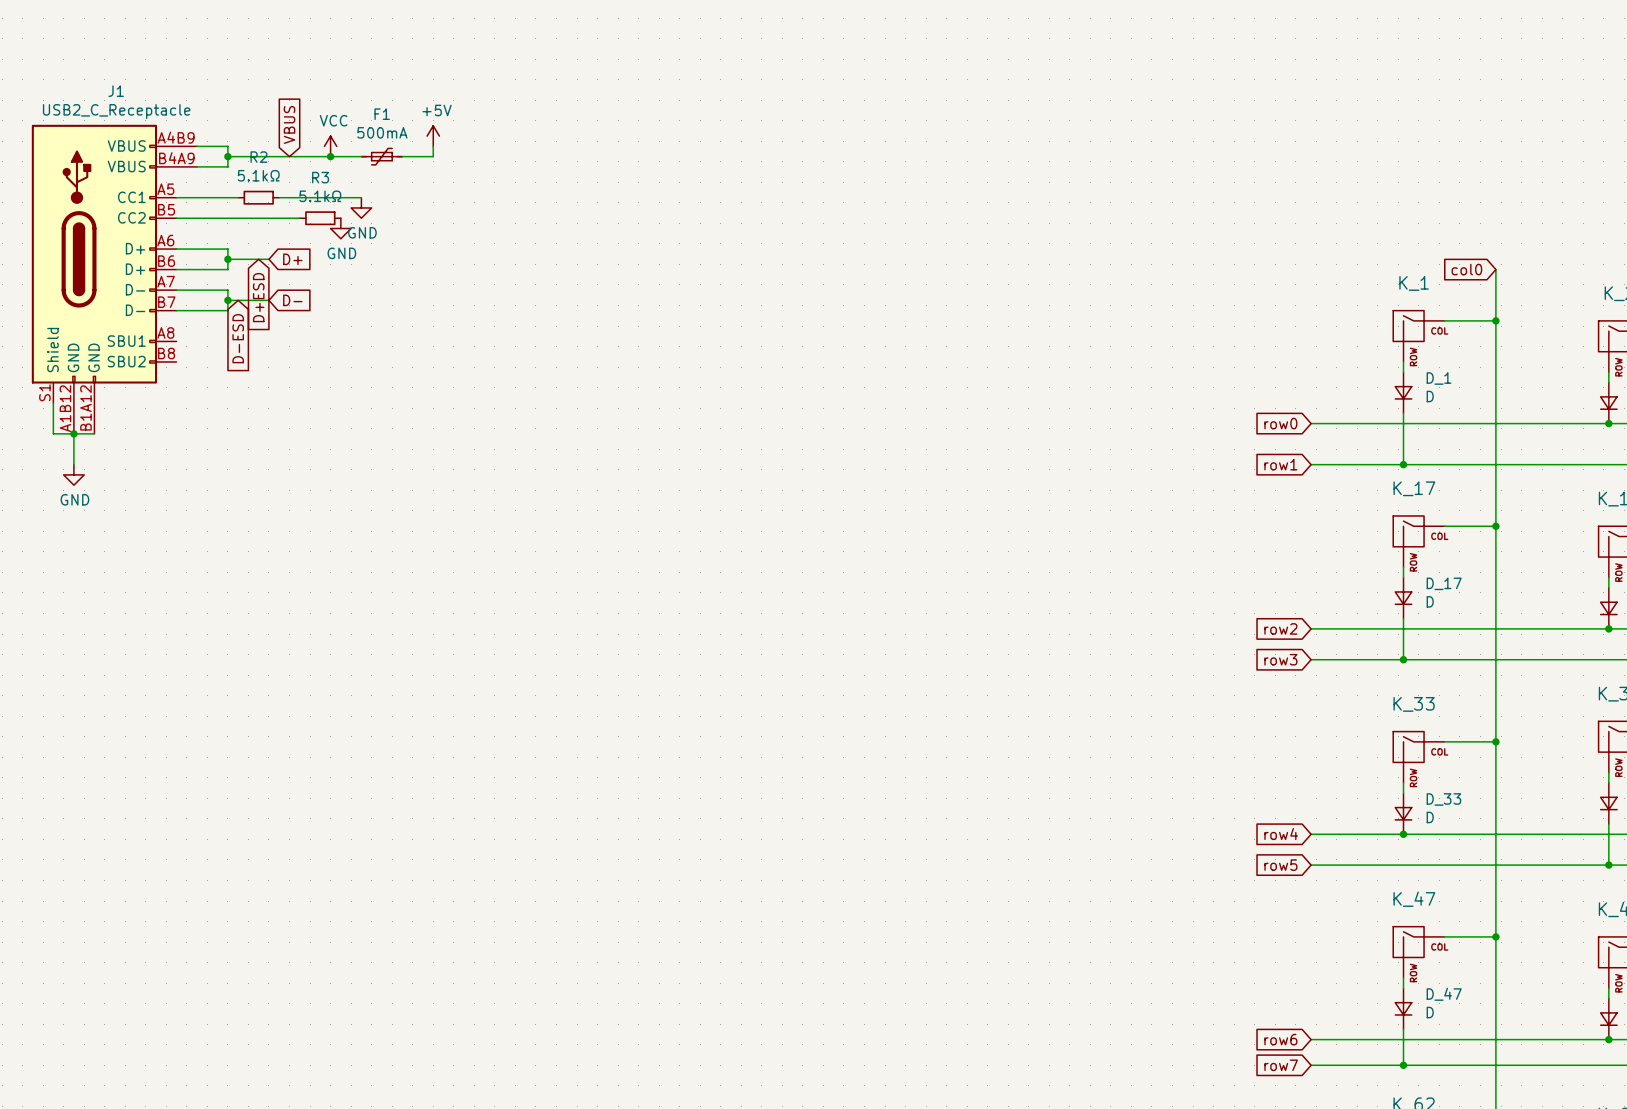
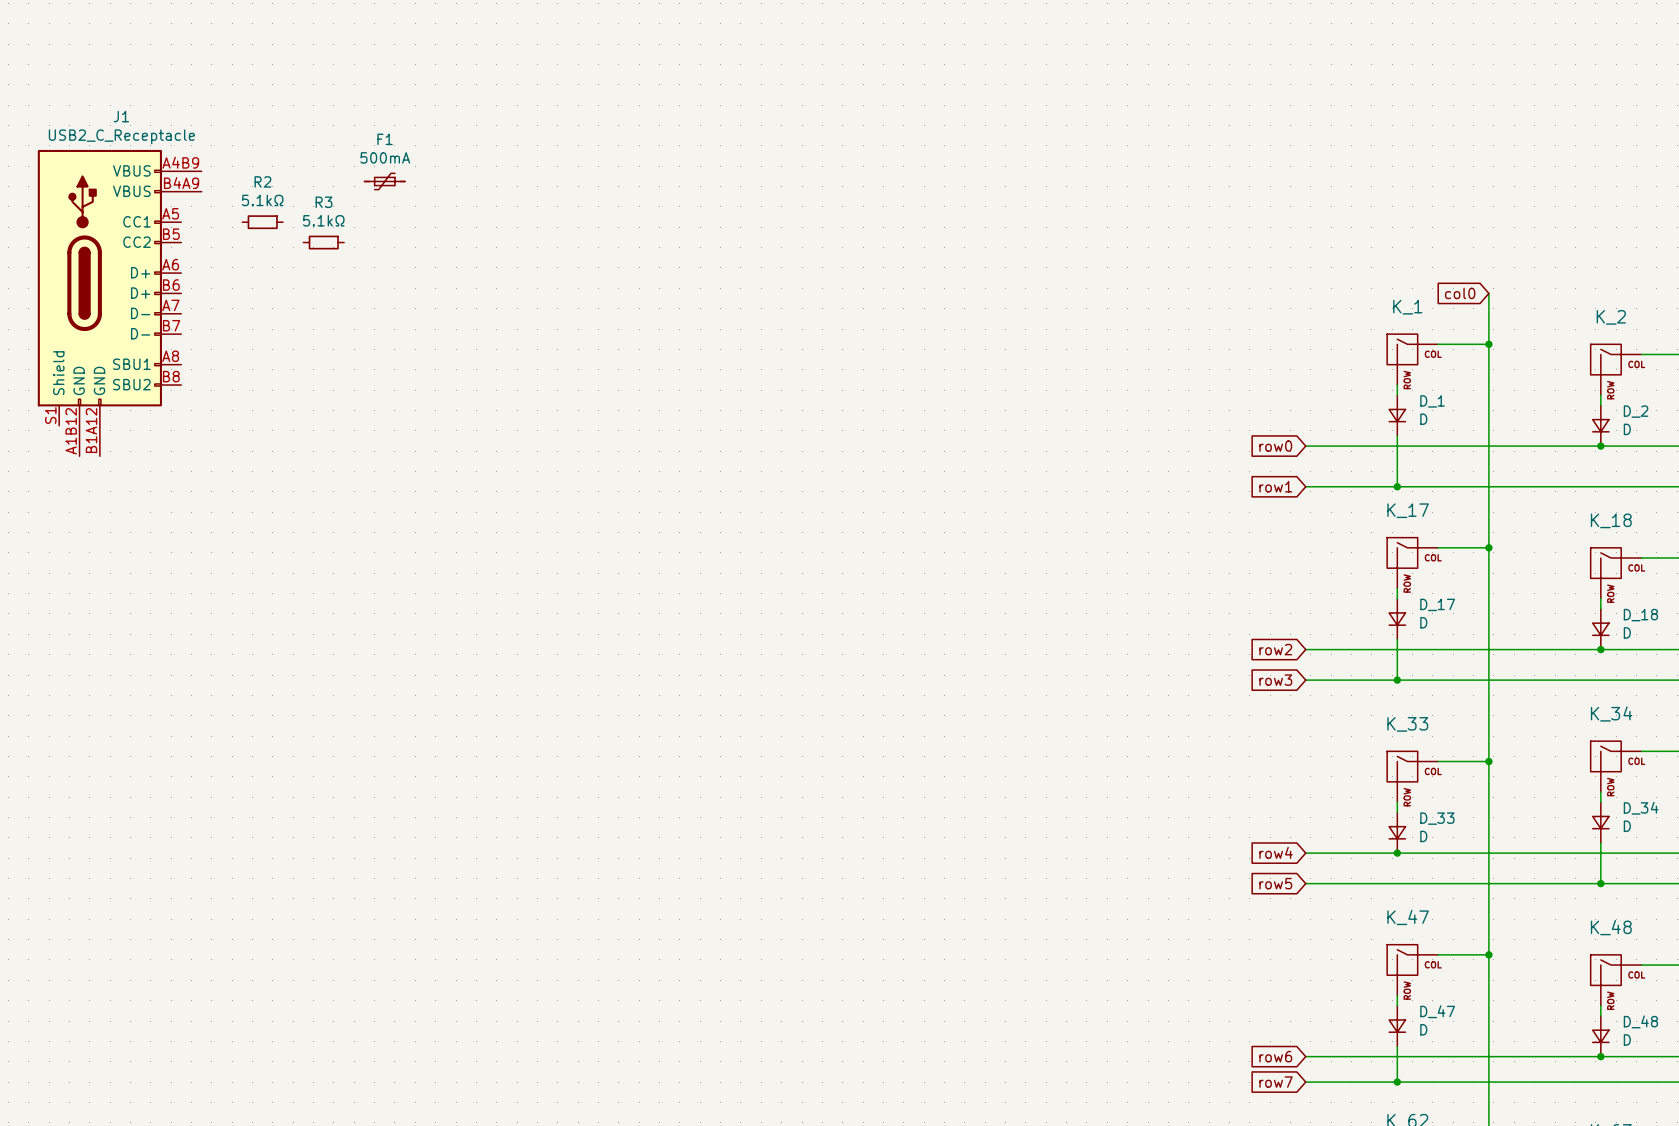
global label: VBUS (289, 124) -> none
power symbol: +5V (433, 136) -> none
wire: (197, 146) (227, 146) (227, 166) (197, 166) -> none
power symbol: VCC (330, 146) -> none
wire: (433, 146) (433, 156) (402, 156) -> none
wire: (227, 156) (361, 156) -> none
junction: (227, 156) -> none
junction: (330, 156) -> none
wire: (176, 197) (238, 197) -> none
wire: (279, 197) (361, 197) -> none
power symbol: GND (361, 207) -> none
wire: (176, 218) (299, 218) -> none
power symbol: GND (340, 228) -> none
wire: (176, 249) (227, 249) (227, 269) (176, 269) -> none
wire: (227, 259) (268, 259) -> none
junction: (227, 259) -> none
global label: D+ (292, 259) -> none
wire: (176, 290) (227, 290) (227, 310) (176, 310) -> none
global label: D+ESD (258, 297) -> none
wire: (227, 300) (268, 300) -> none
junction: (227, 300) -> none
global label: D- (292, 300) -> none
global label: D-ESD (238, 338) -> none
wire: (53, 403) (53, 433) (94, 433) -> none
wire: (73, 433) (73, 464) -> none
junction: (73, 433) -> none
power symbol: GND (73, 474) -> none

